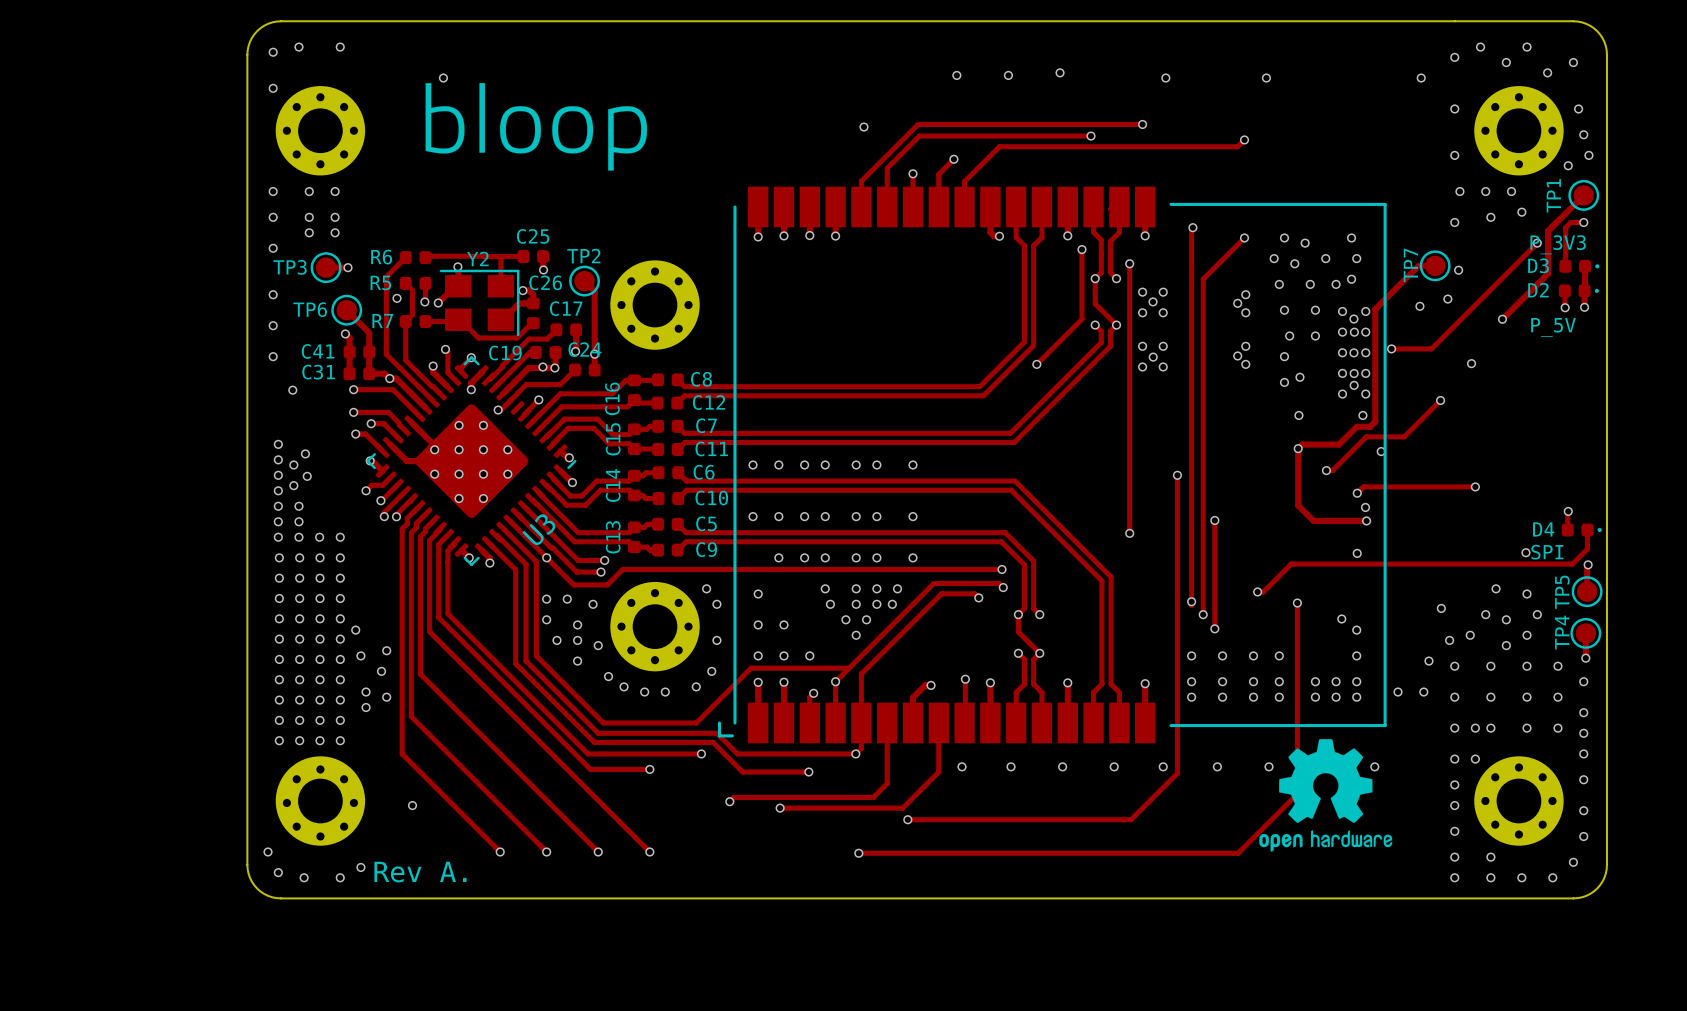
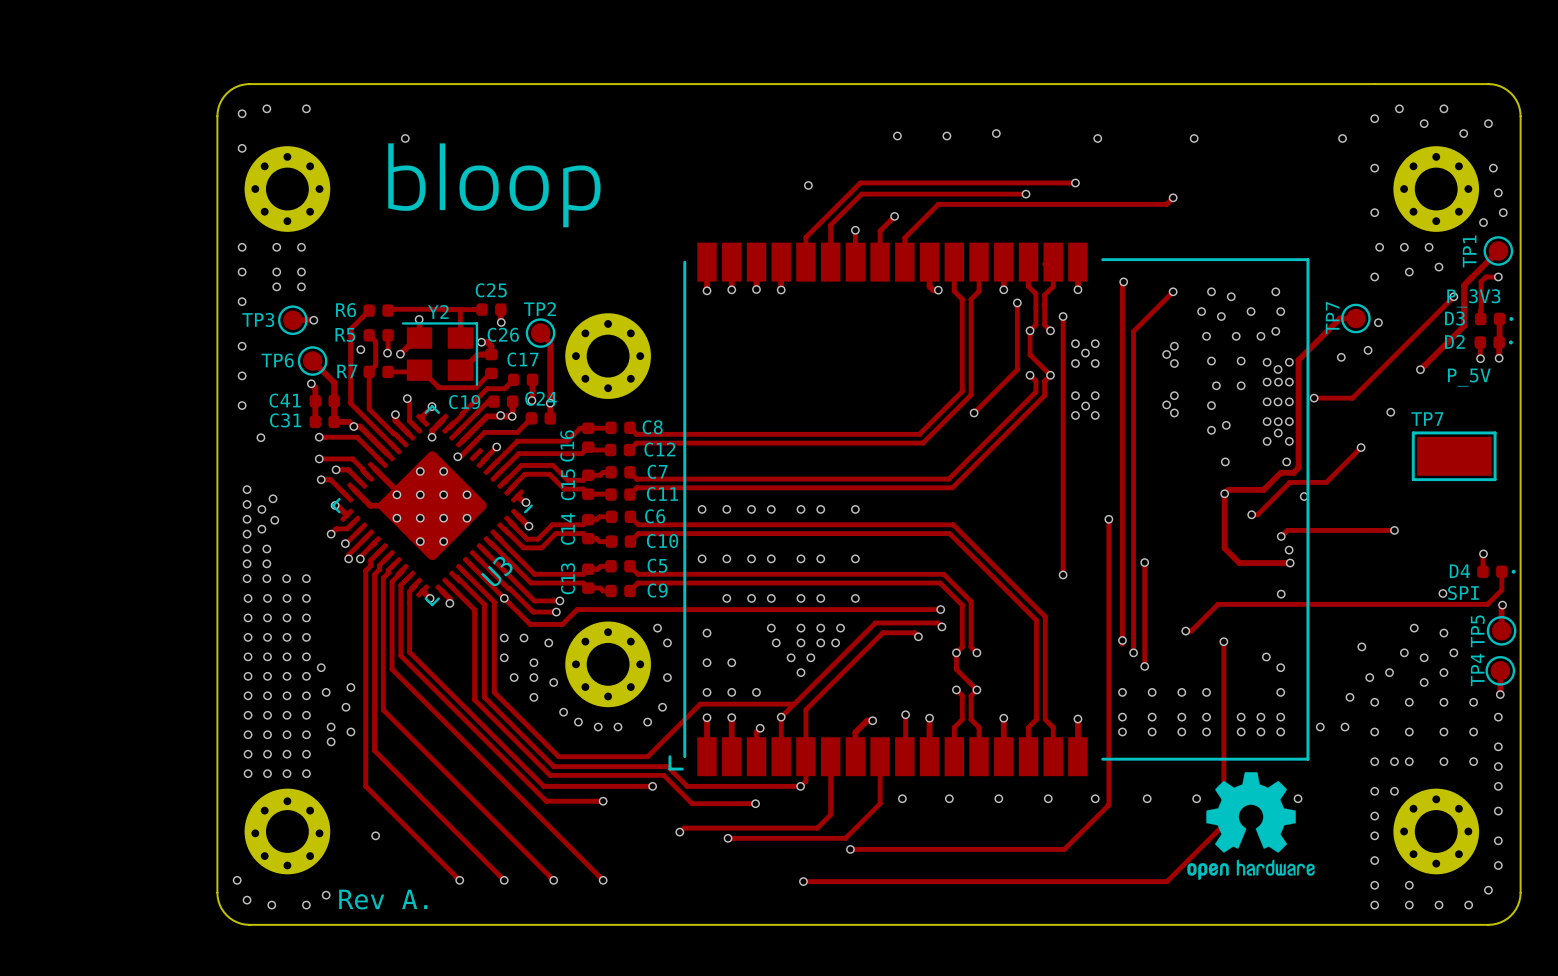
TP7: none -> (1454, 456)

